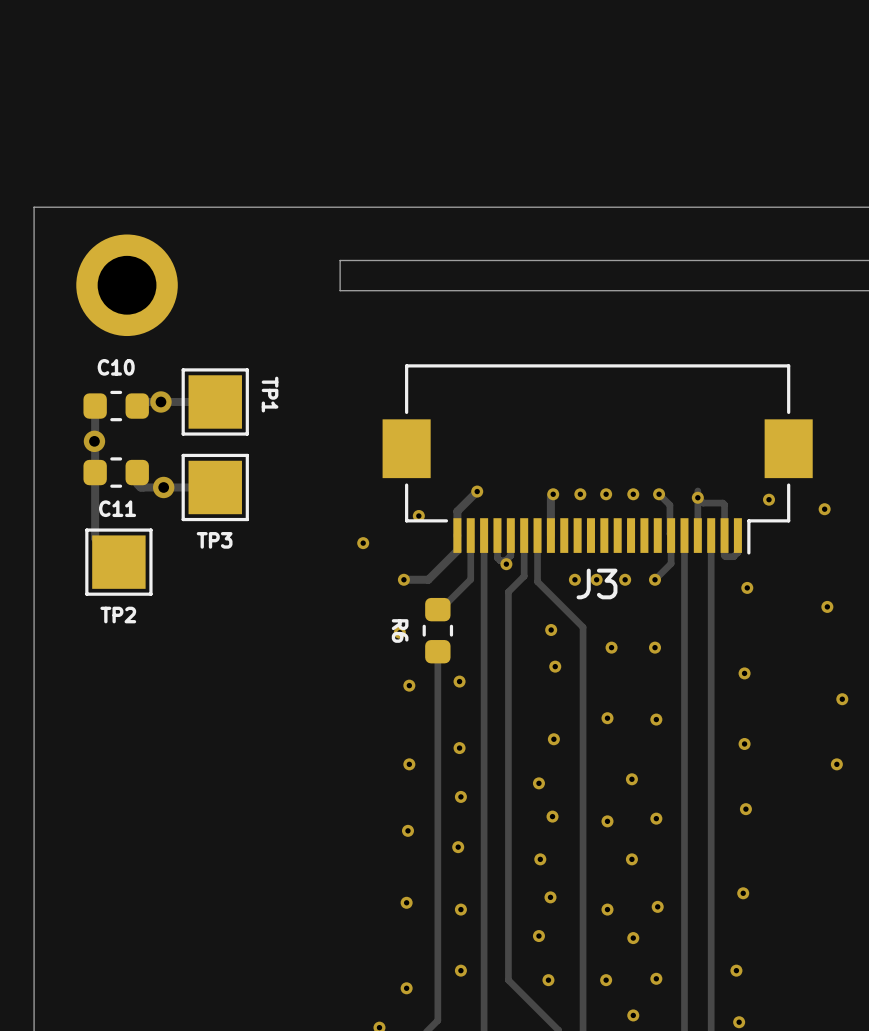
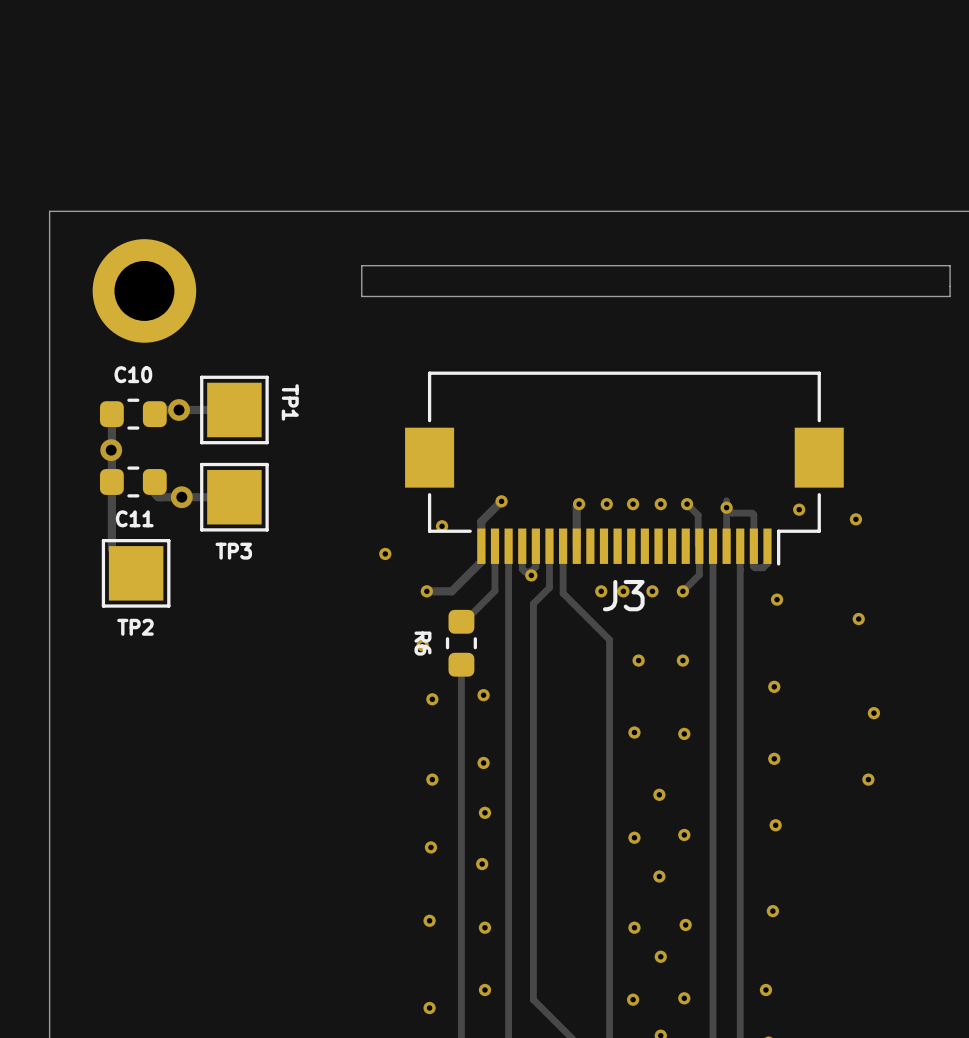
via: (551, 629) -> none
via: (555, 666) -> none
via: (553, 739) -> none
via: (538, 783) -> none
via: (552, 816) -> none
via: (540, 859) -> none
via: (550, 897) -> none
via: (538, 936) -> none
via: (548, 980) -> none

